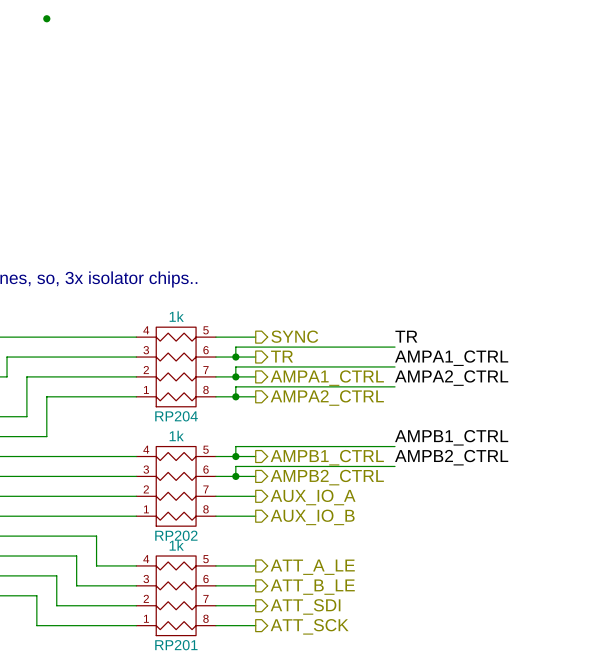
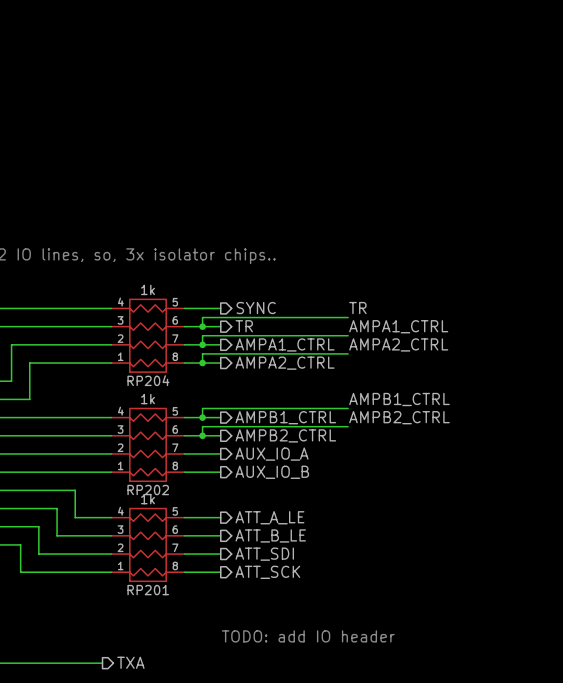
junction: (46, 18) -> none

